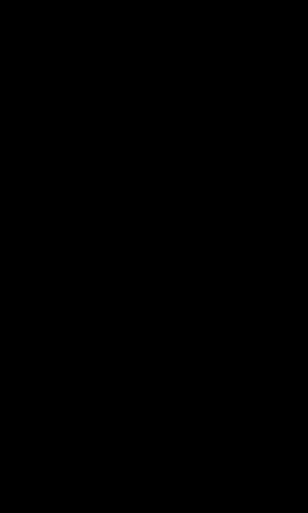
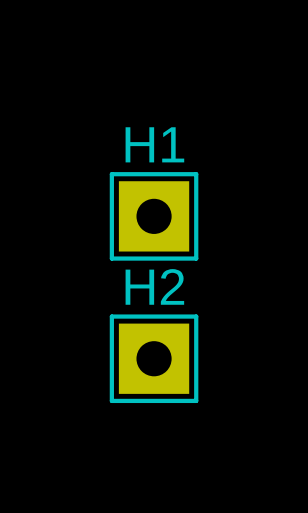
H1: none -> (154, 216)
H2: none -> (154, 358)

